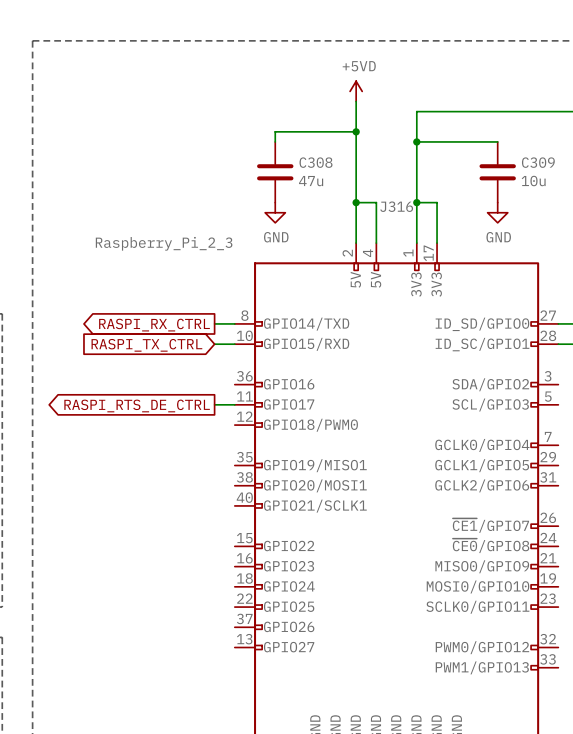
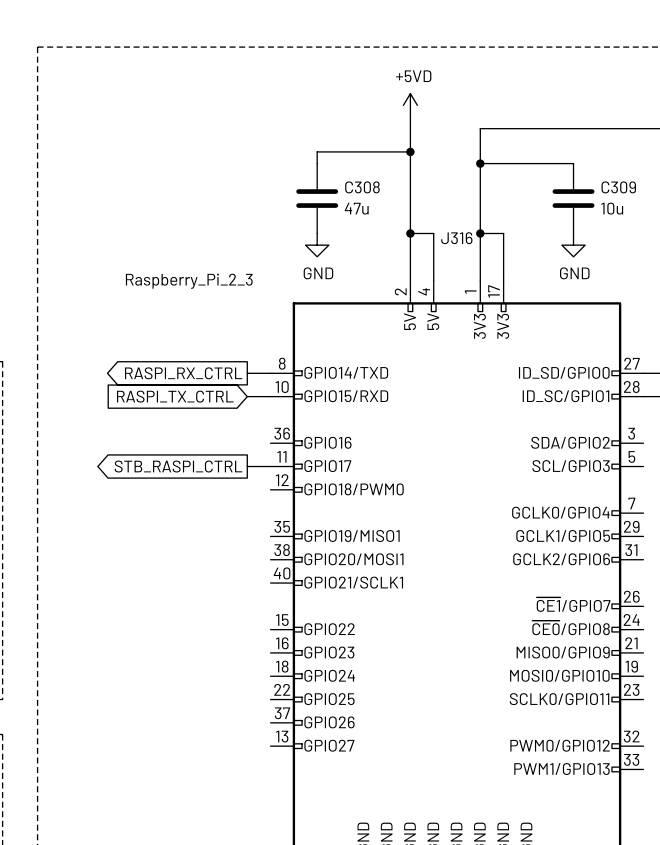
global label: RASPI_RTS_DE_CTRL (137, 405) -> STB_RASPI_CTRL (178, 466)

